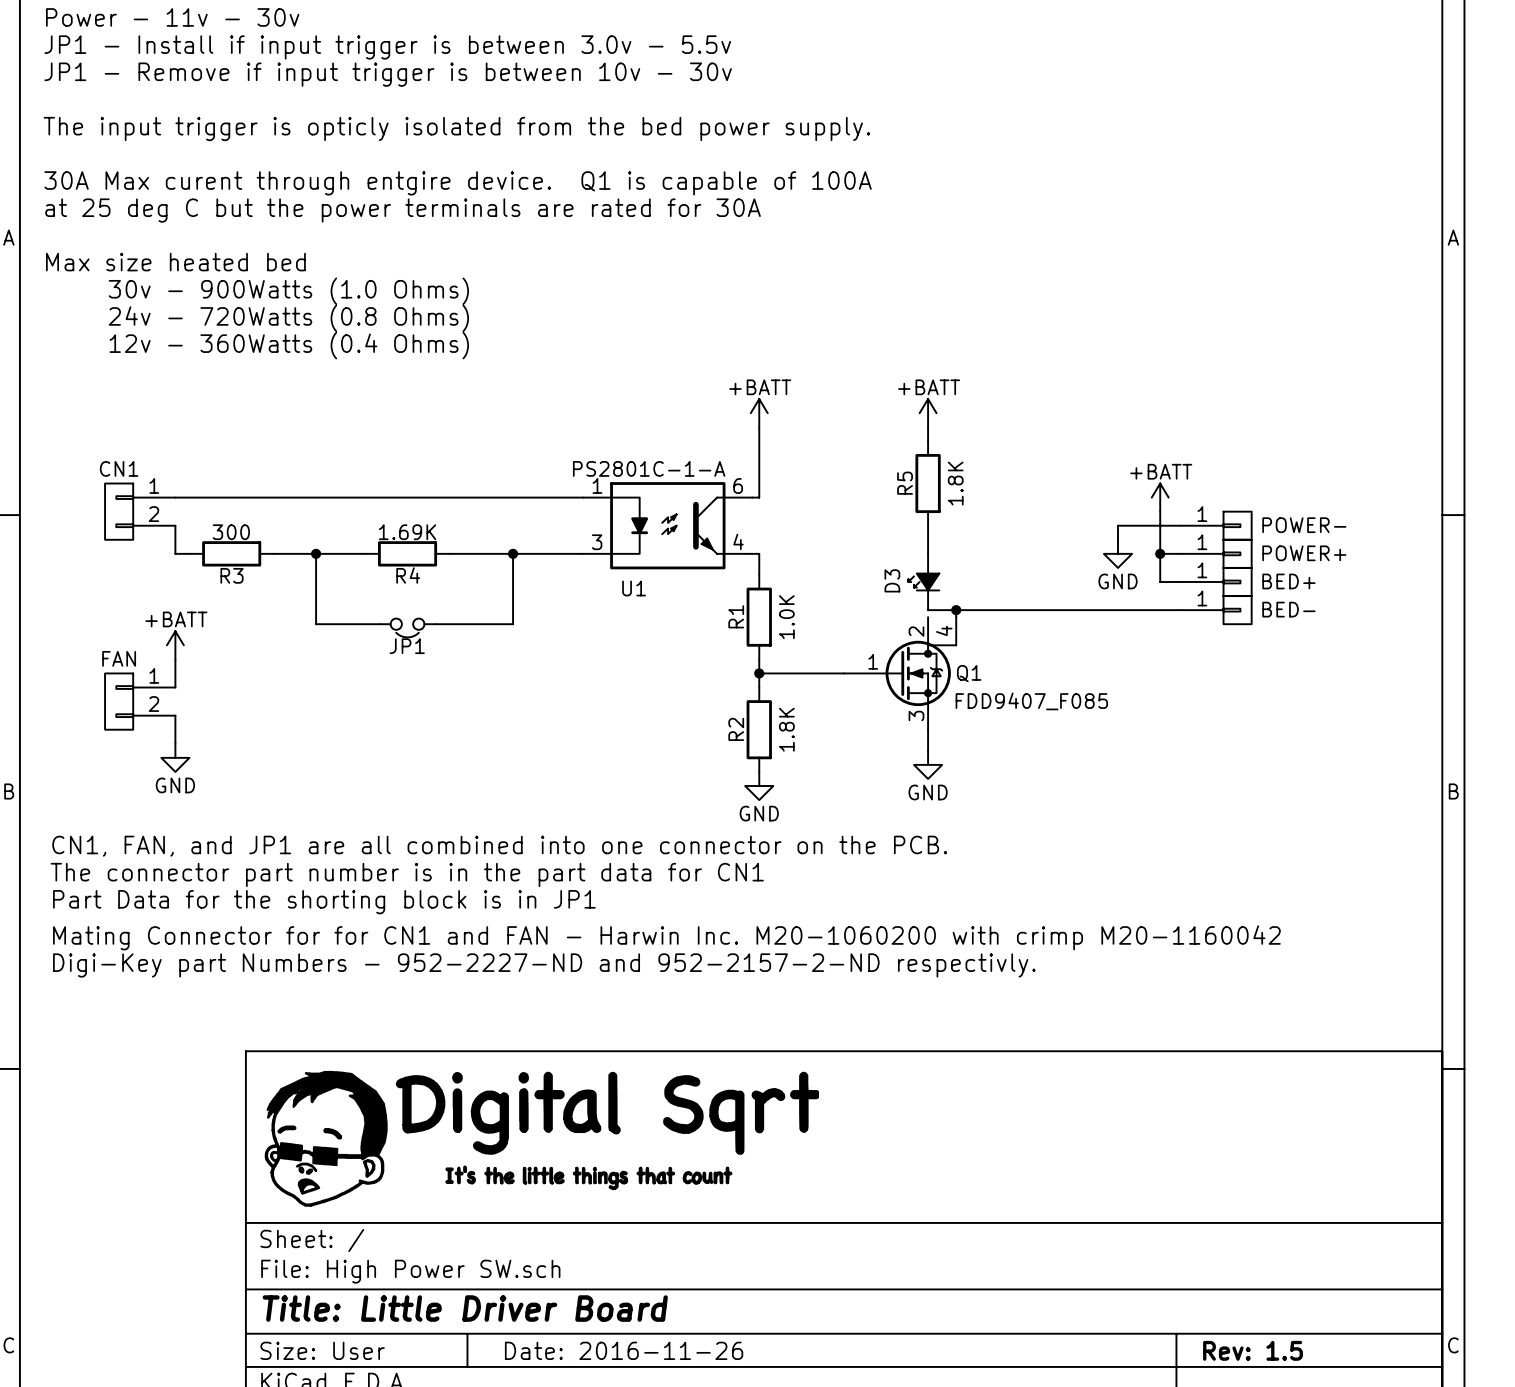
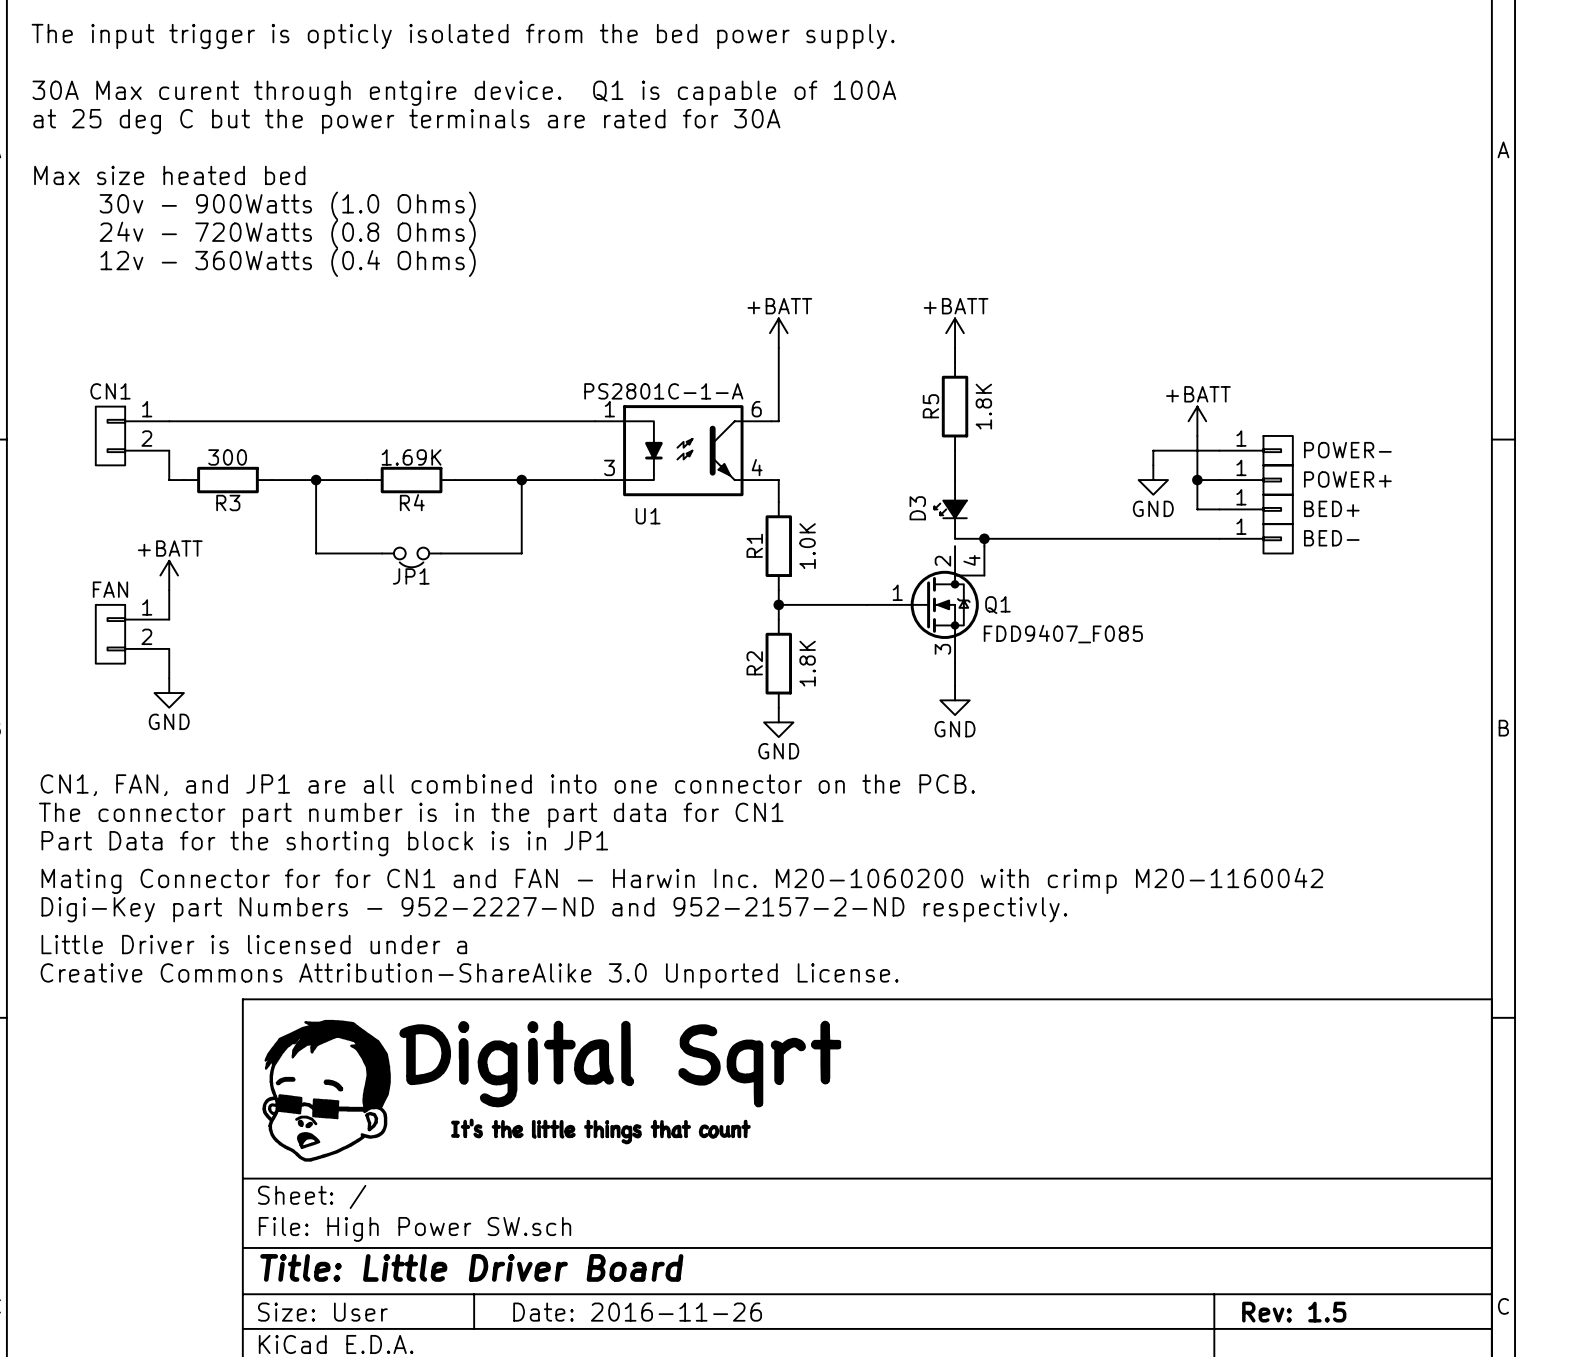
text: none -> Little Driver is licensed under a (254, 944)
text: none -> Creative Commons Attribution-ShareAlike 3.0 Unported License. (469, 975)

